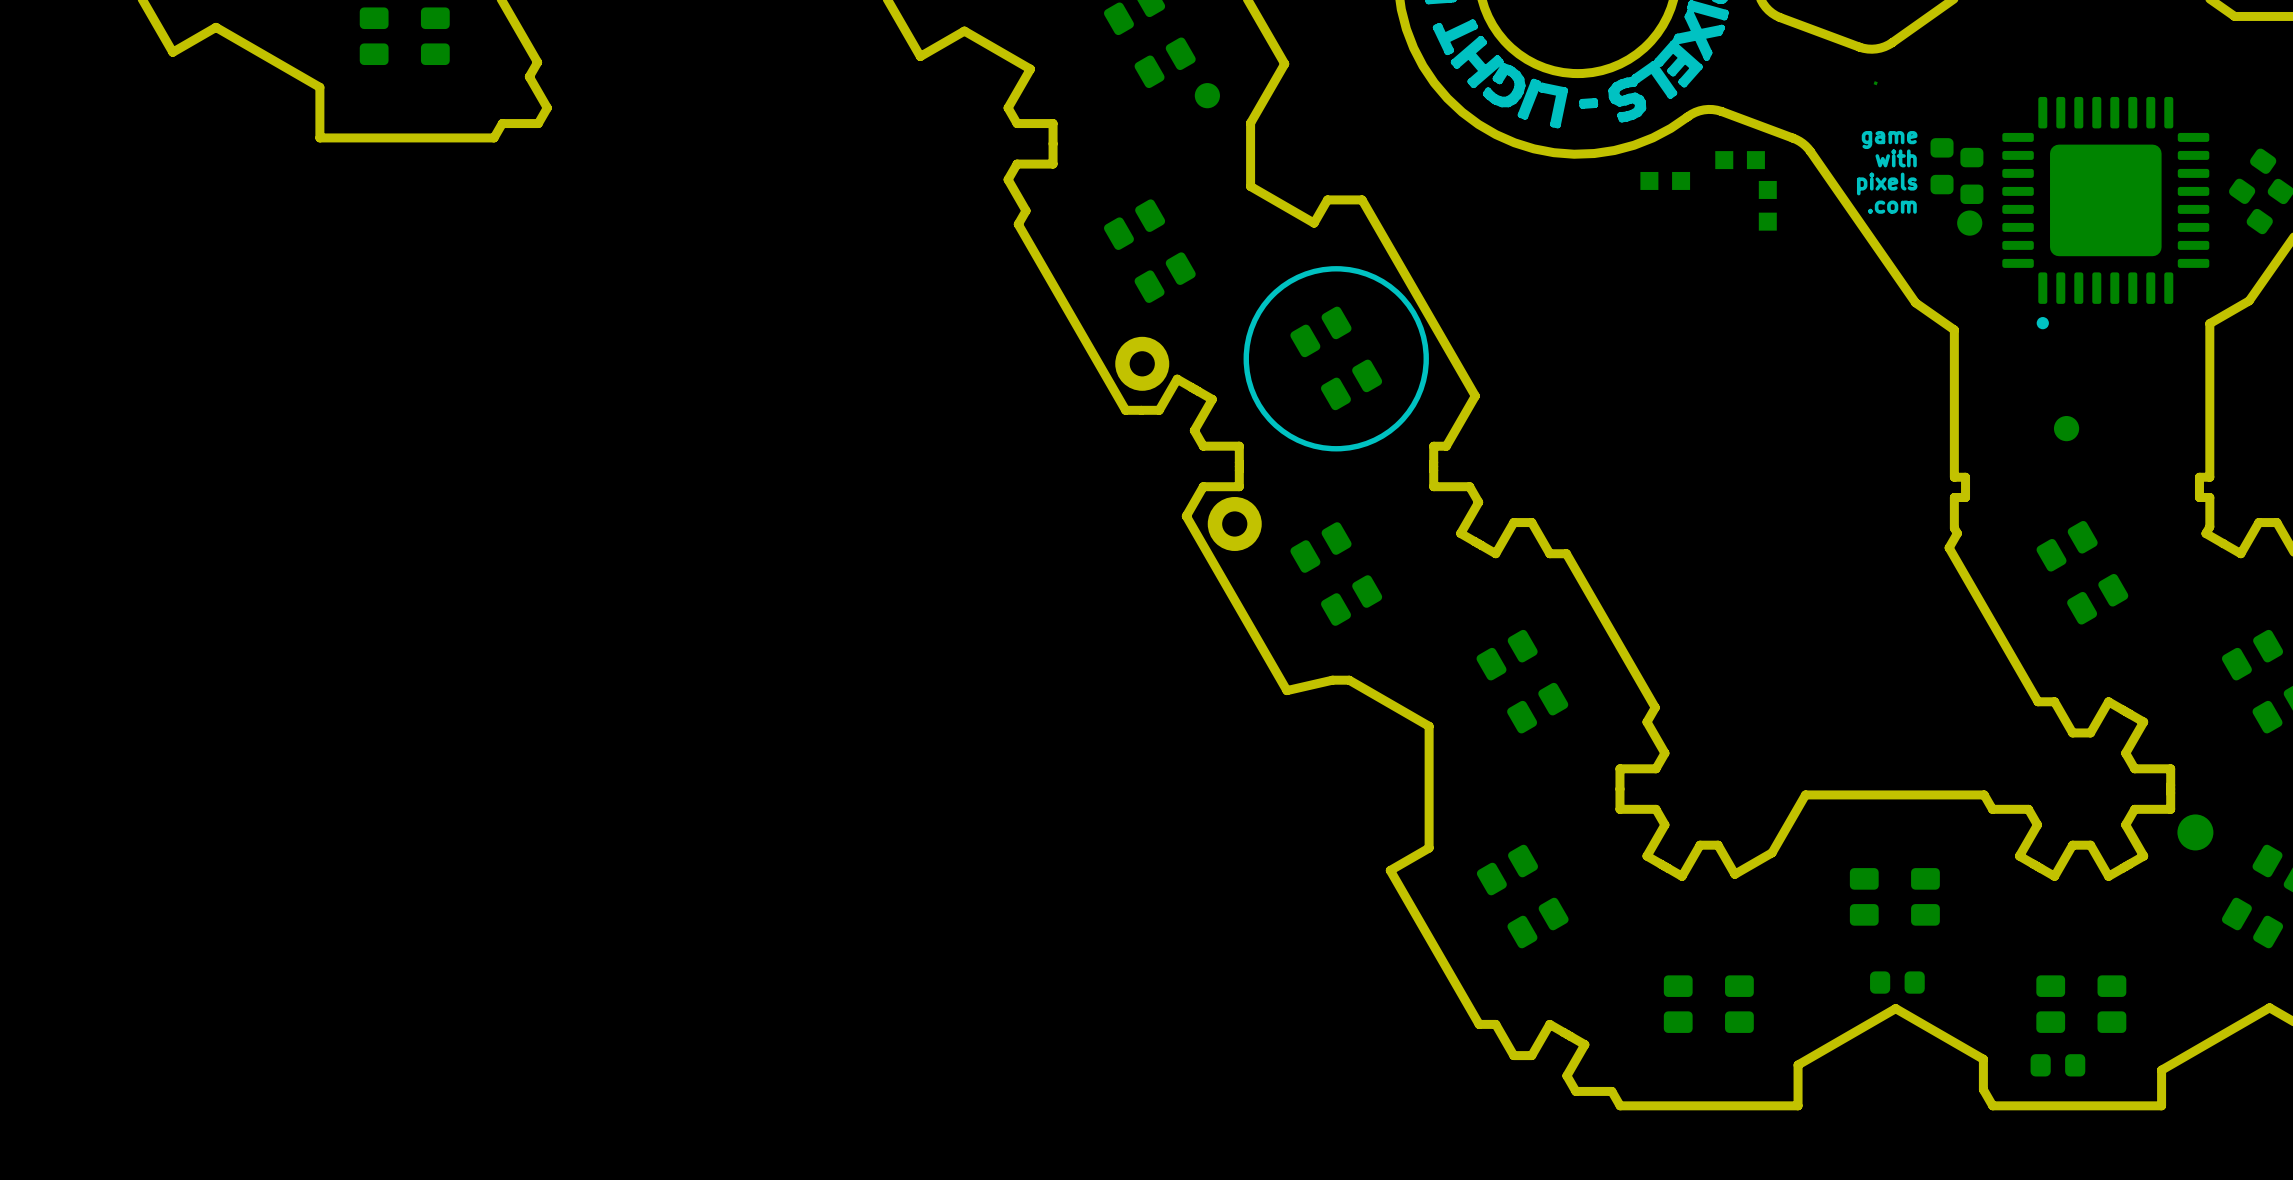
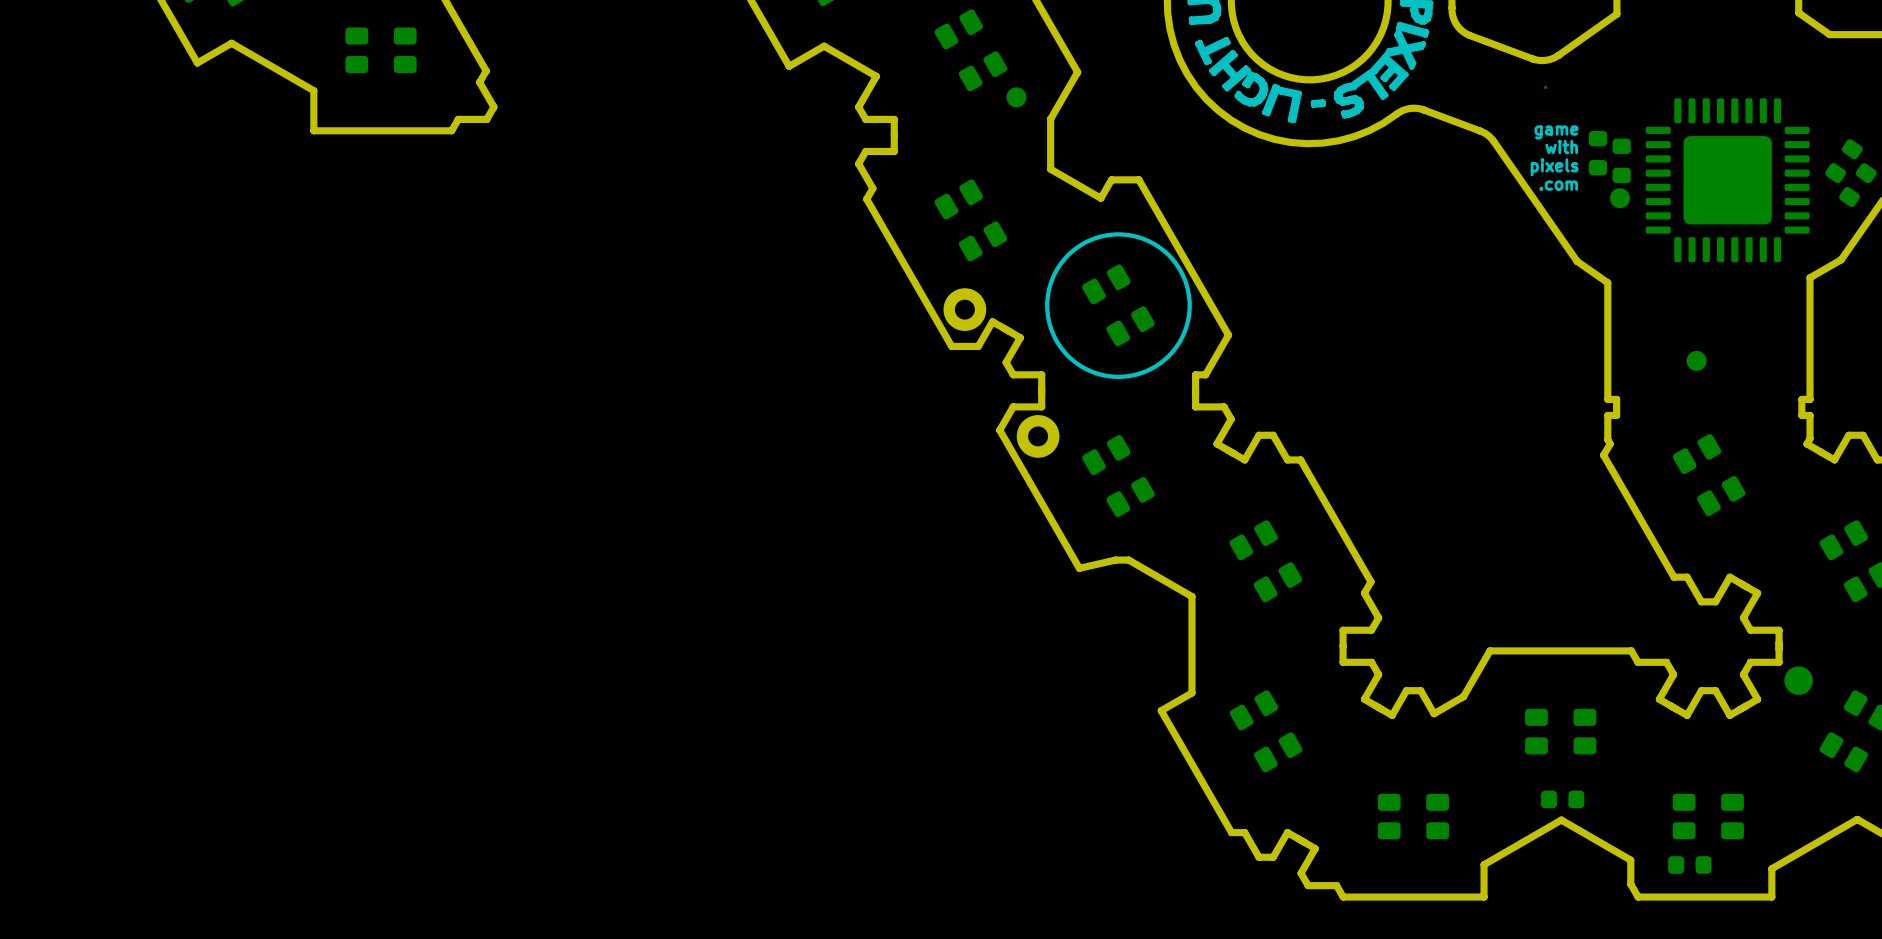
part: (1740, 160) -> none
part: (1665, 180) -> none
part: (1767, 205) -> none
drawing: [2036, 317, 2049, 330] -> none

